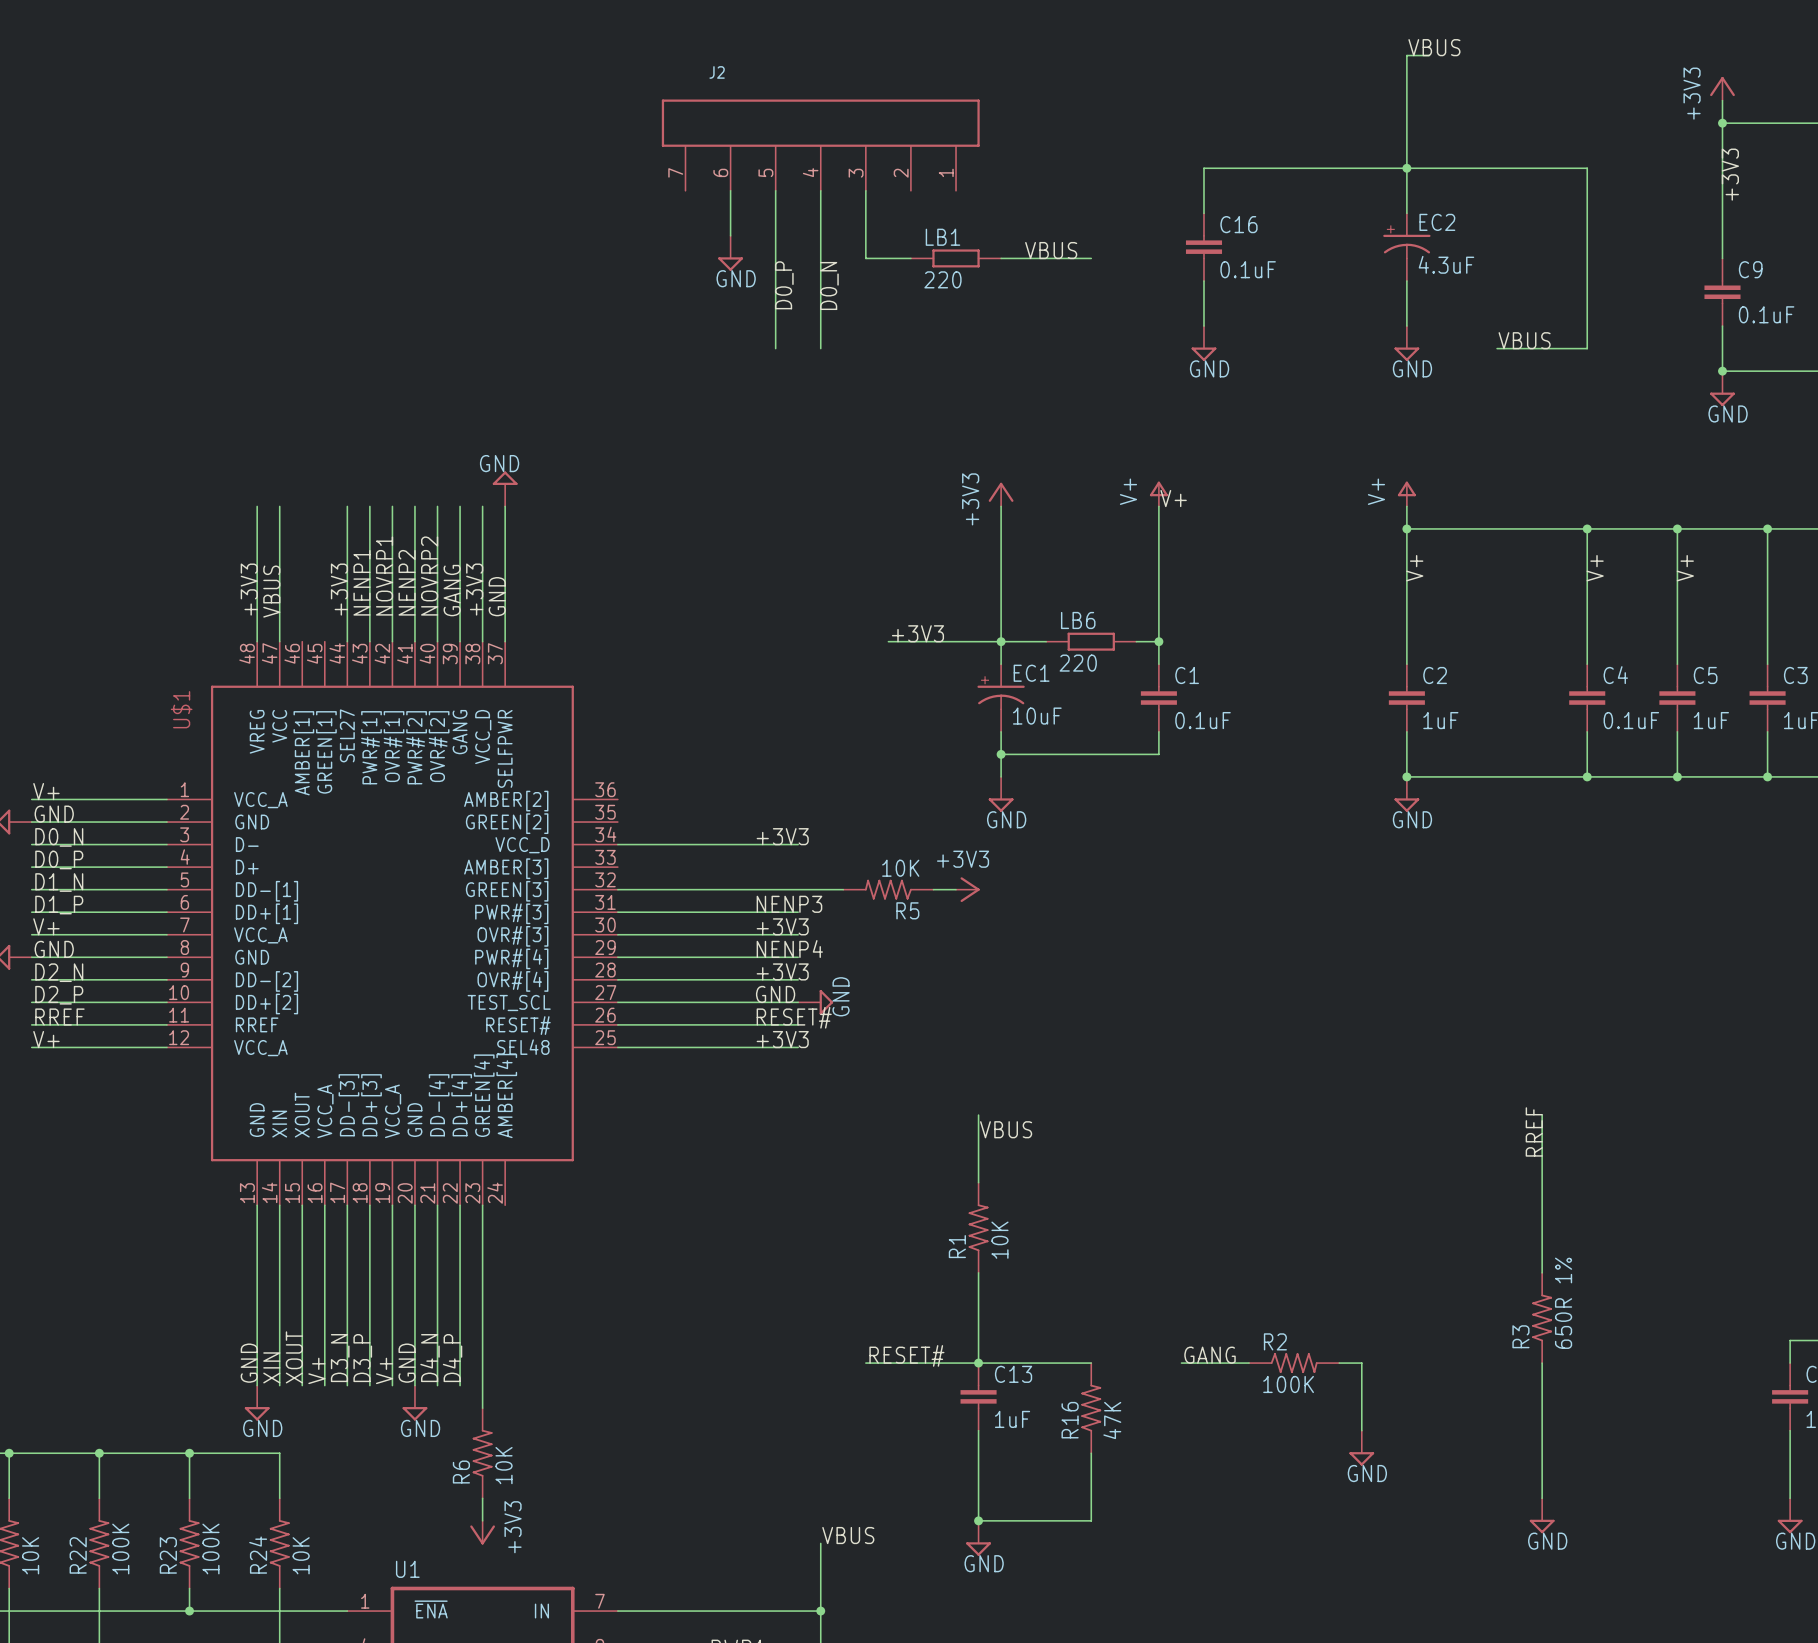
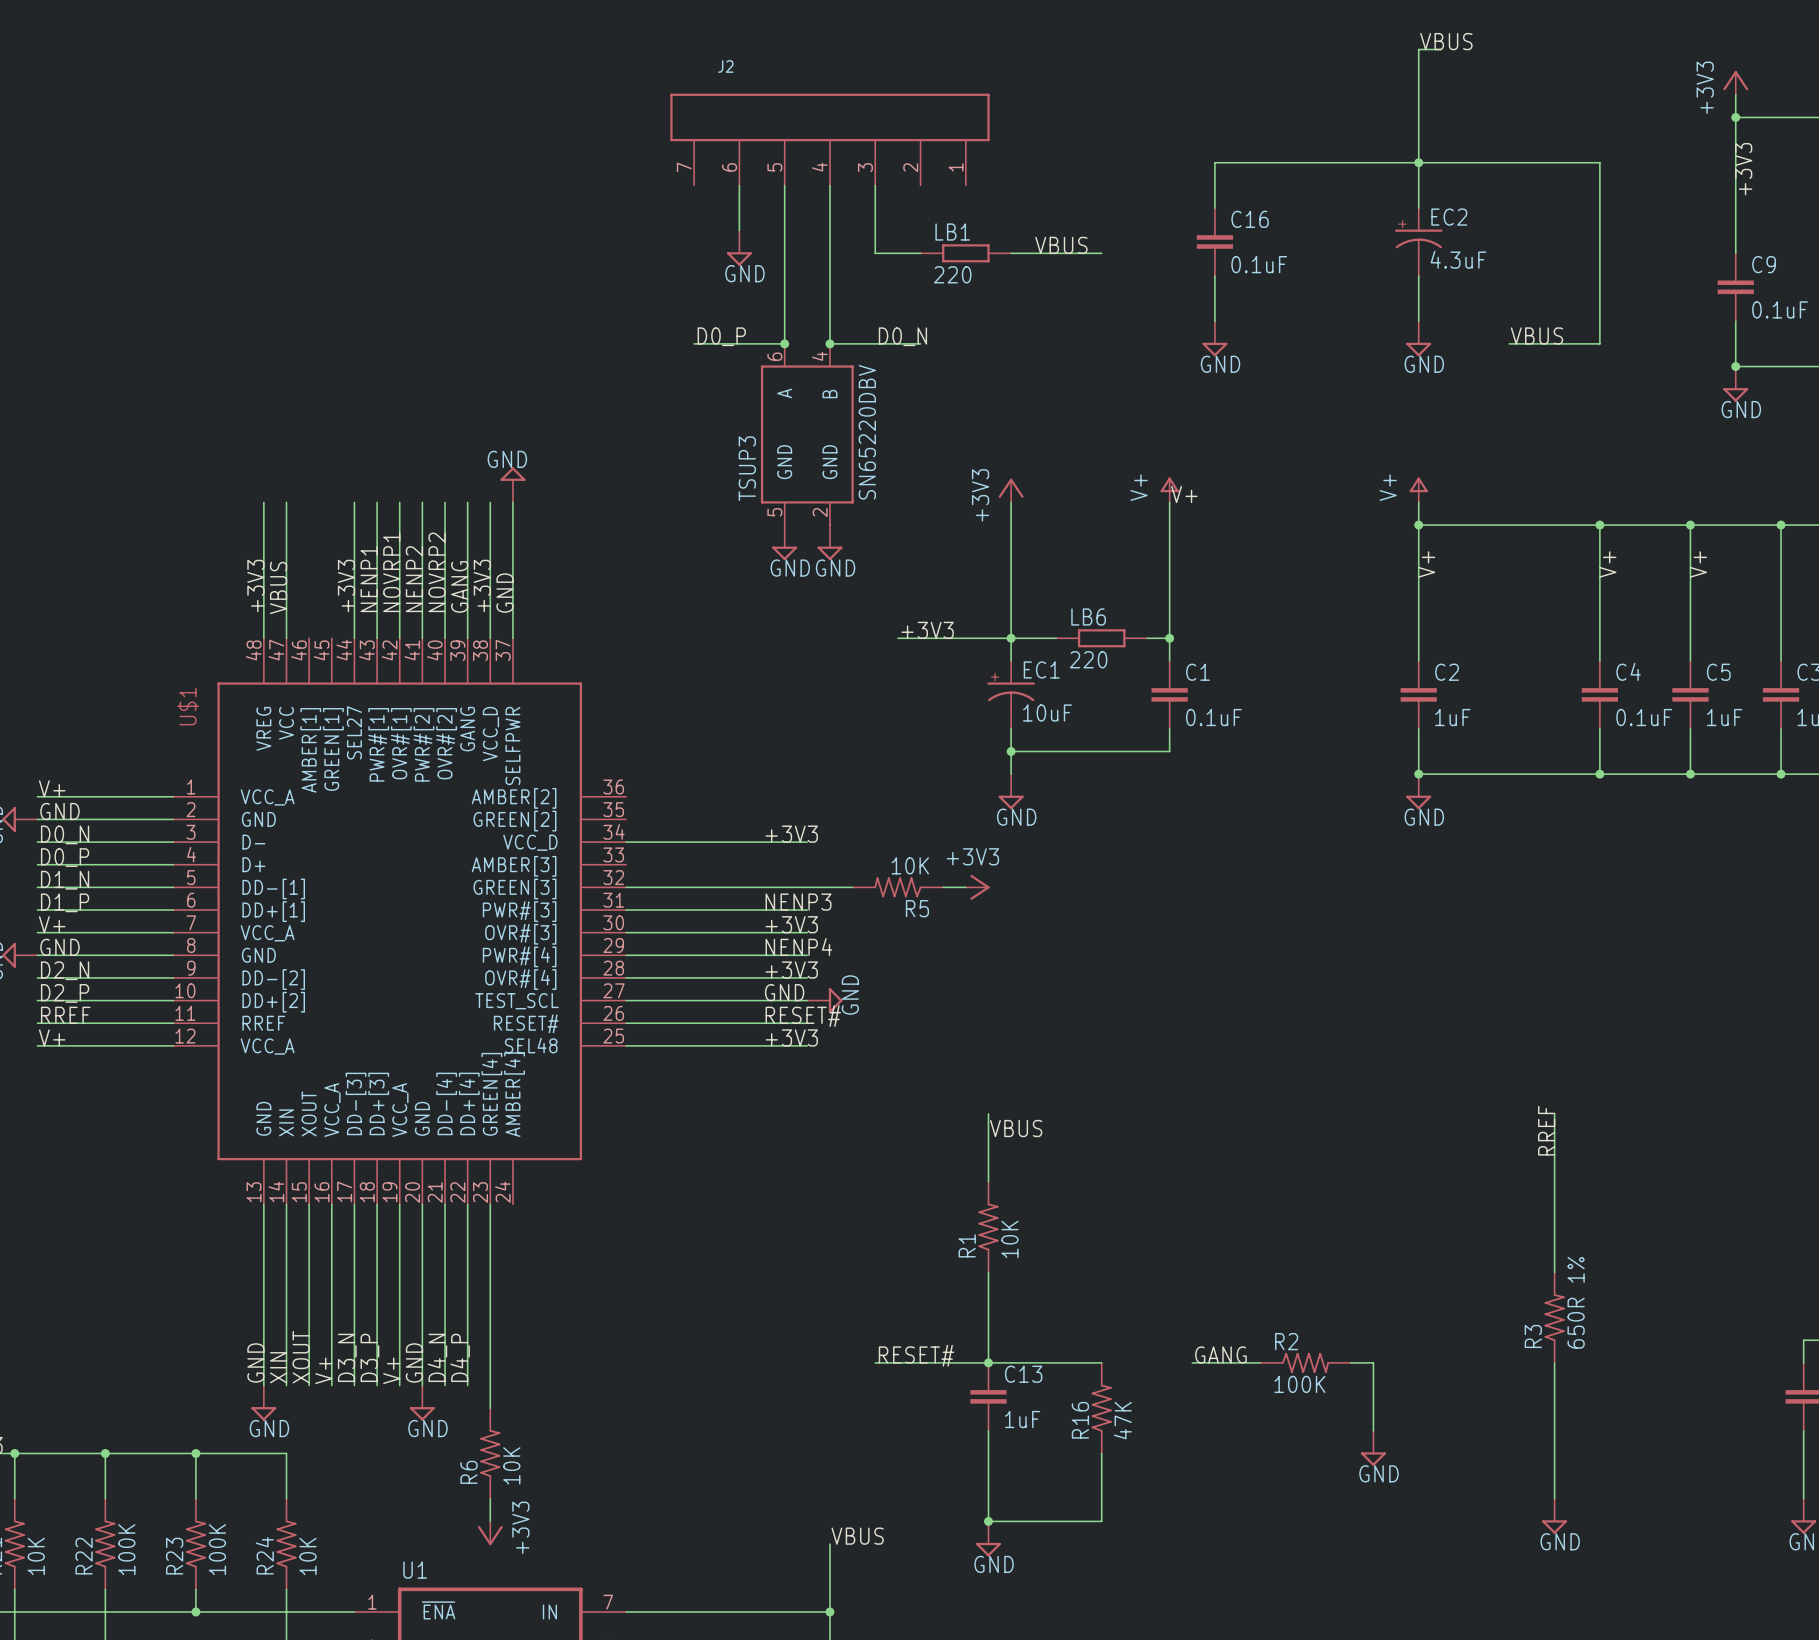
label rotation: 0° (784, 285) -> 90° clockwise (721, 336)
label position: D0_P (784, 285) -> D0_P (721, 336)
label rotation: 0° (829, 285) -> 90° clockwise (902, 336)
label position: D0_N (829, 285) -> D0_N (902, 336)
wire: none -> (694, 343) (784, 343)
junction: none -> (784, 343)
wire: none -> (829, 343) (920, 343)
junction: none -> (829, 343)
TSUP3: none -> SN65220DBV (807, 434)
power symbol: none -> GND (784, 542)
power symbol: none -> GND (829, 542)

